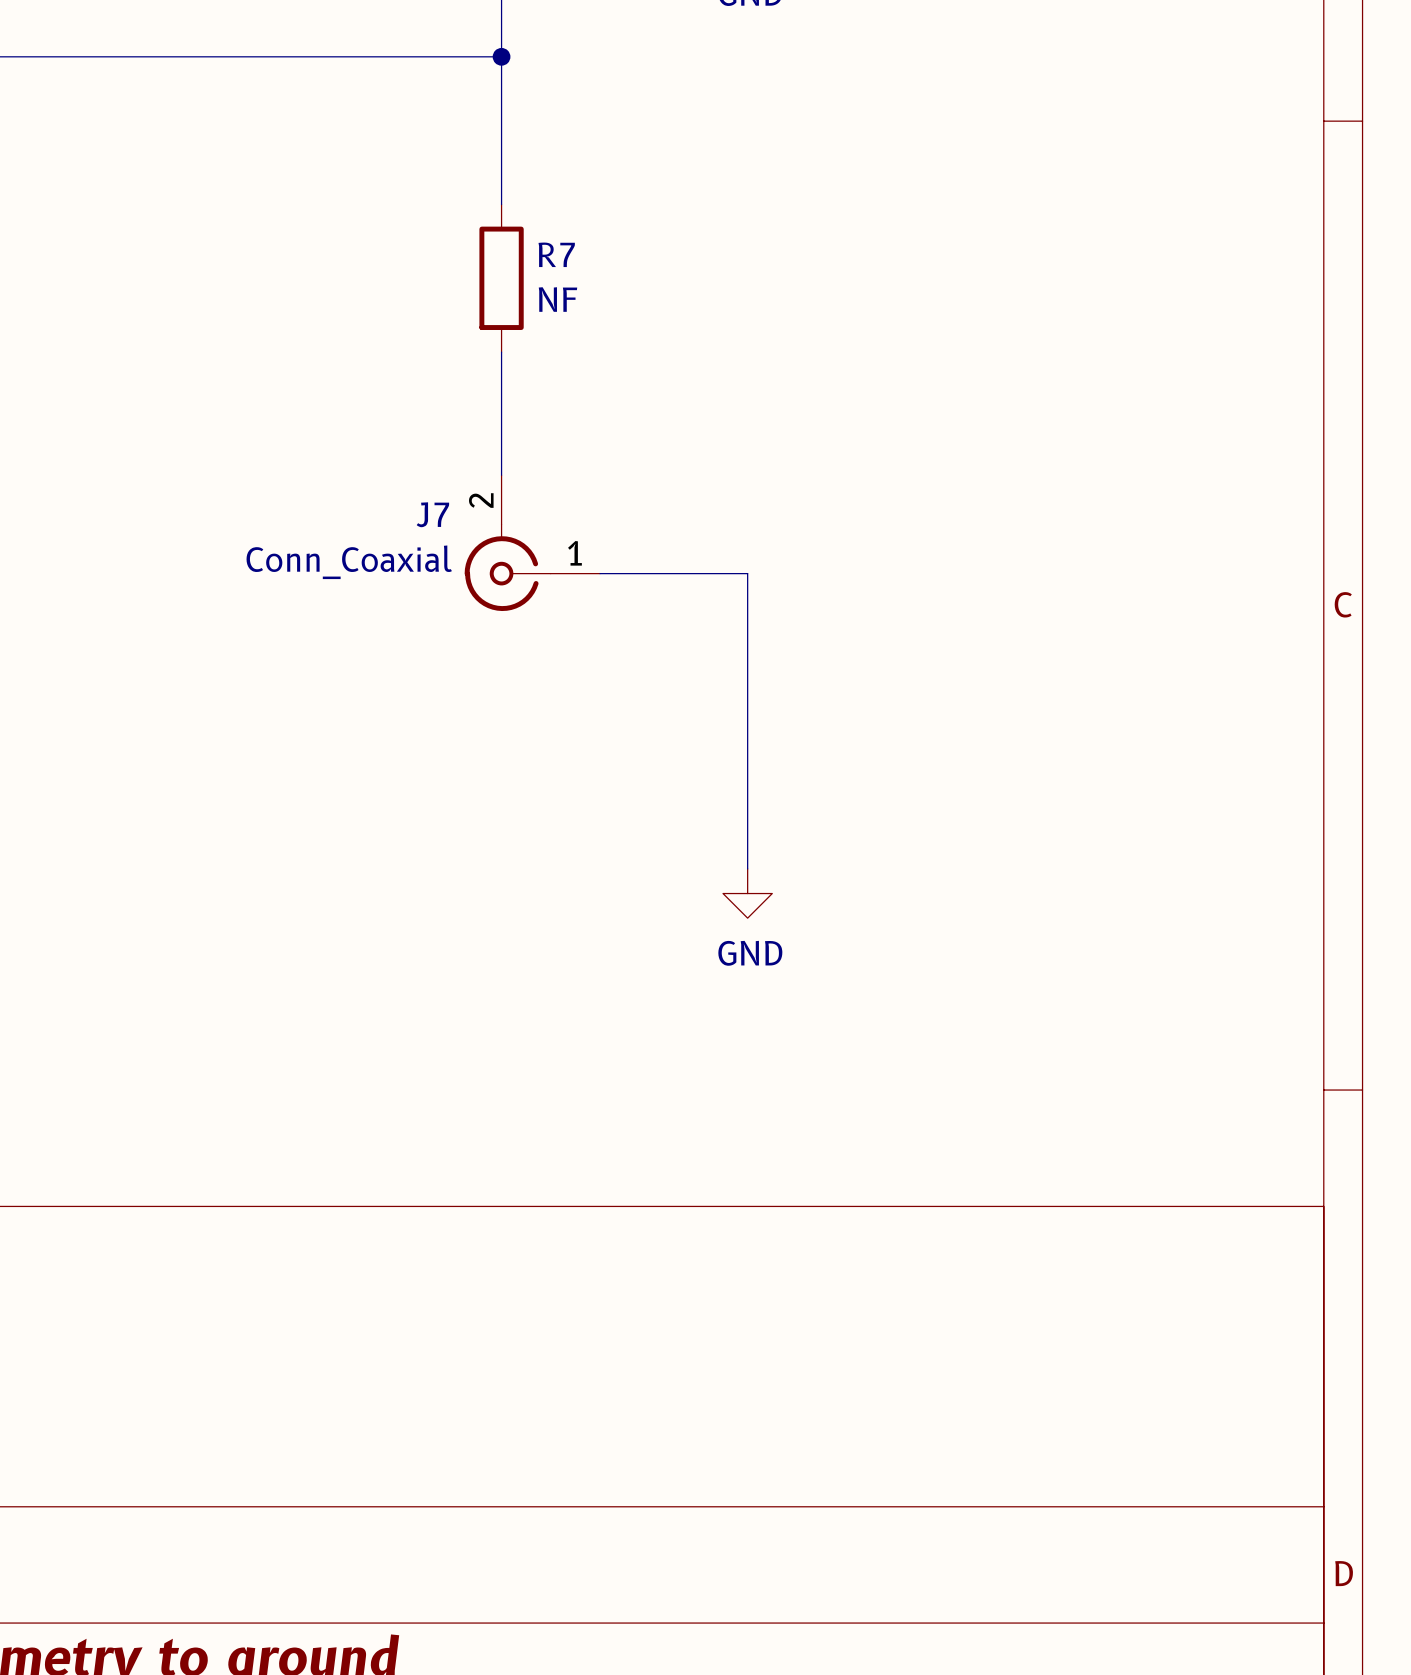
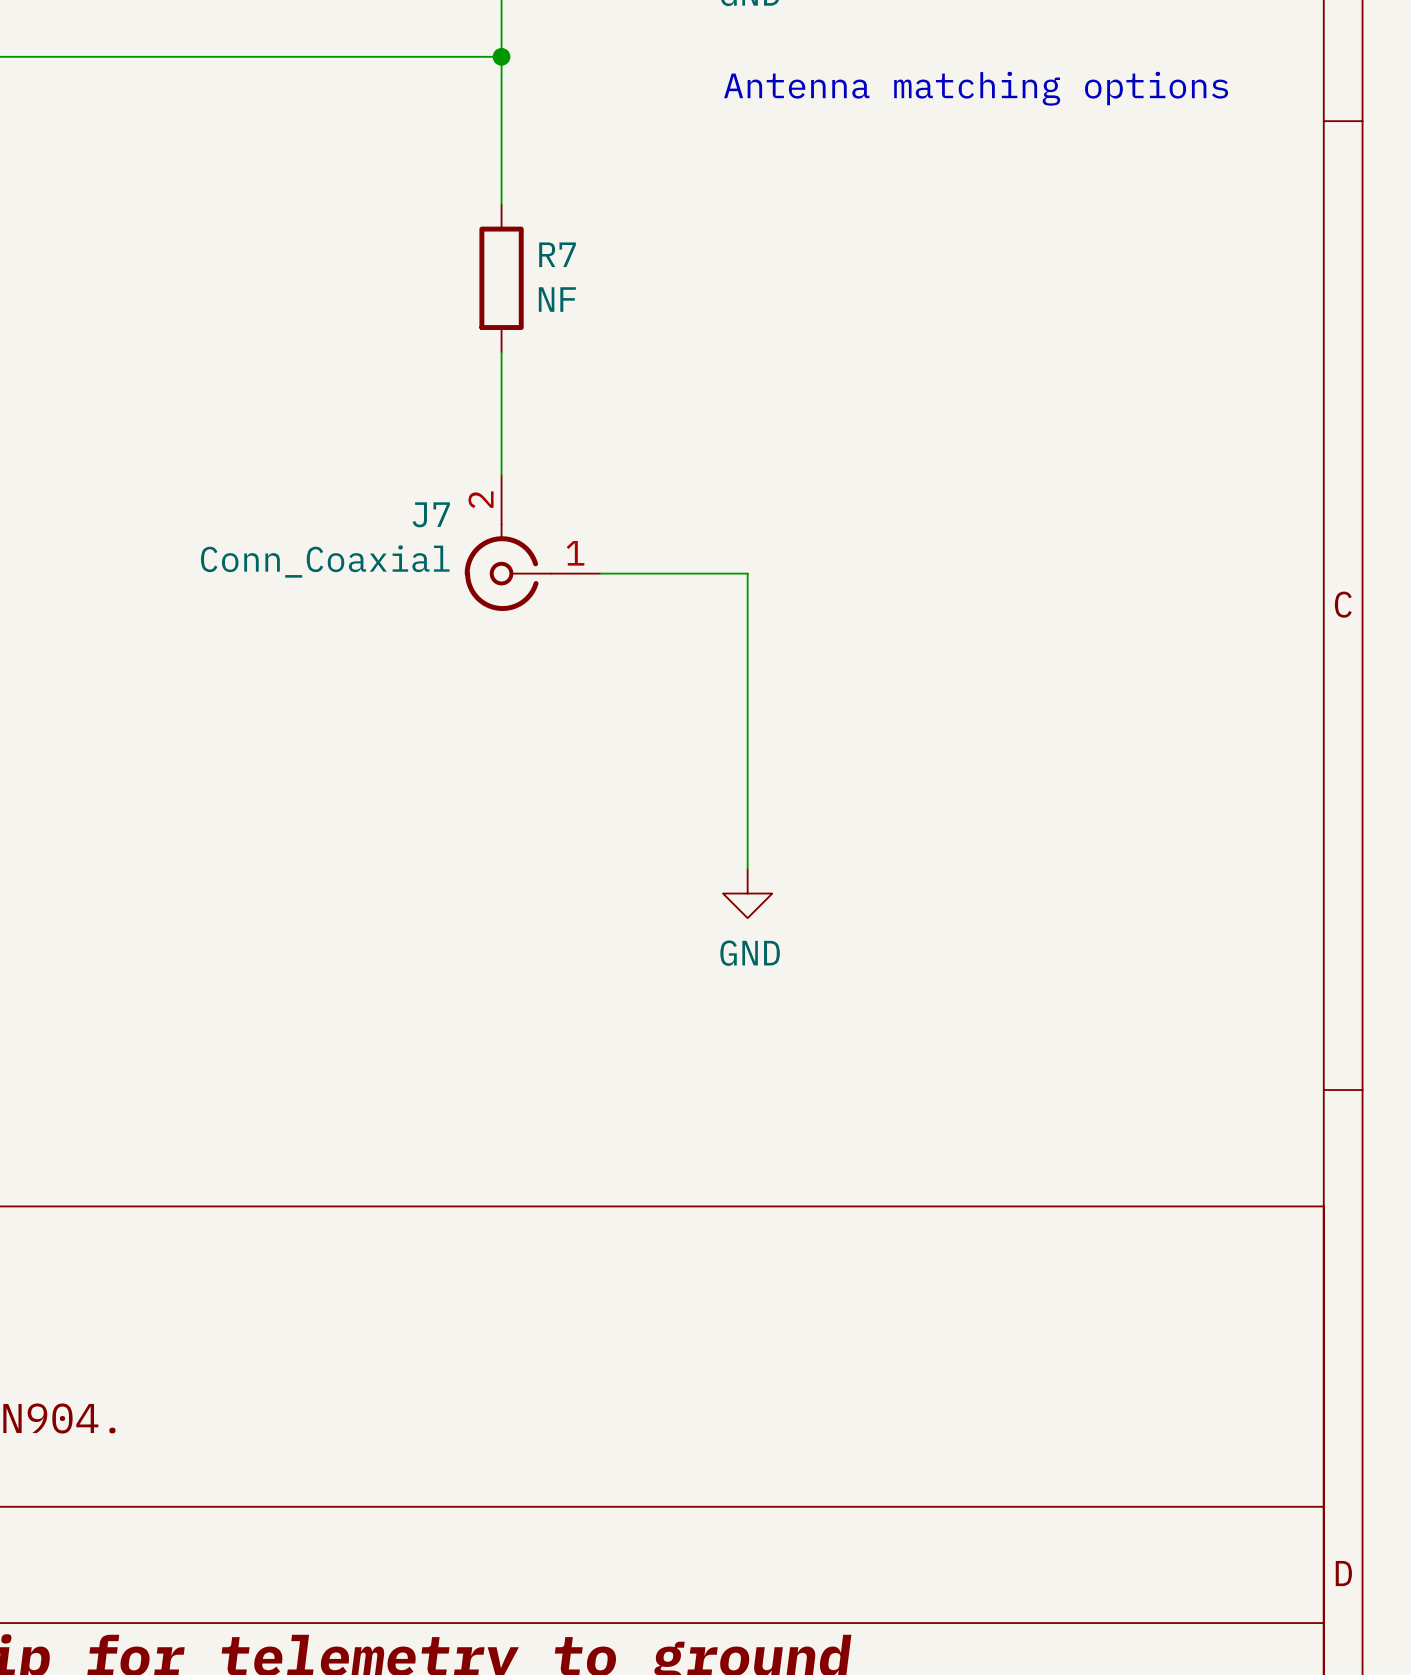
text: none -> Antenna matching options (976, 88)

